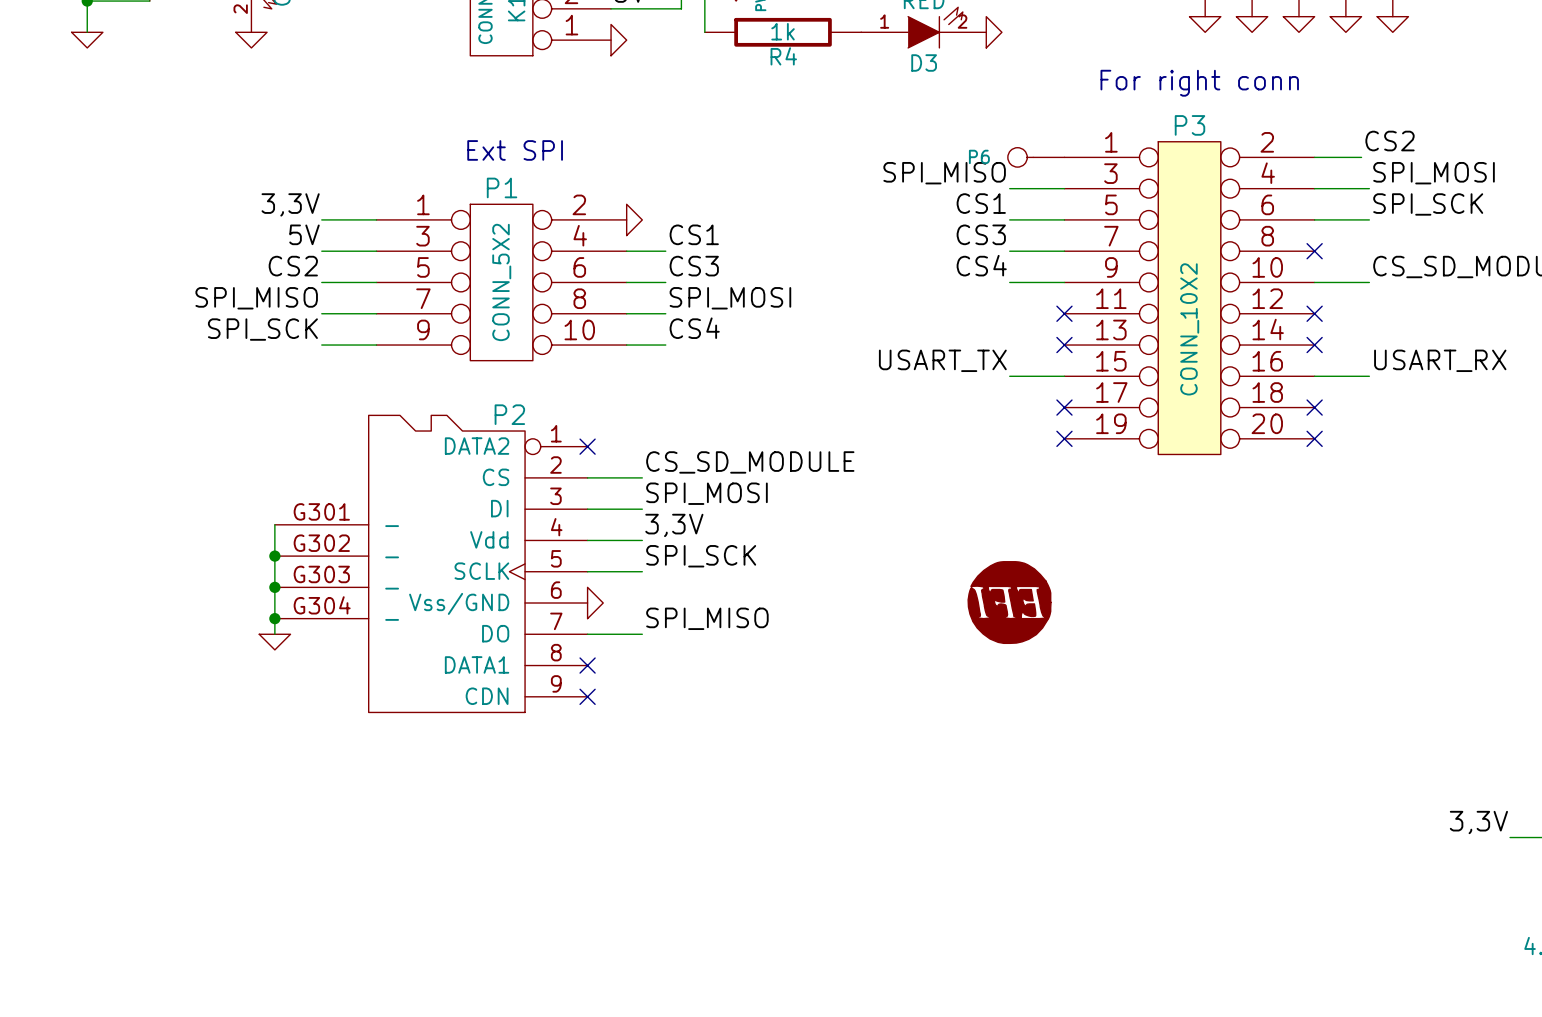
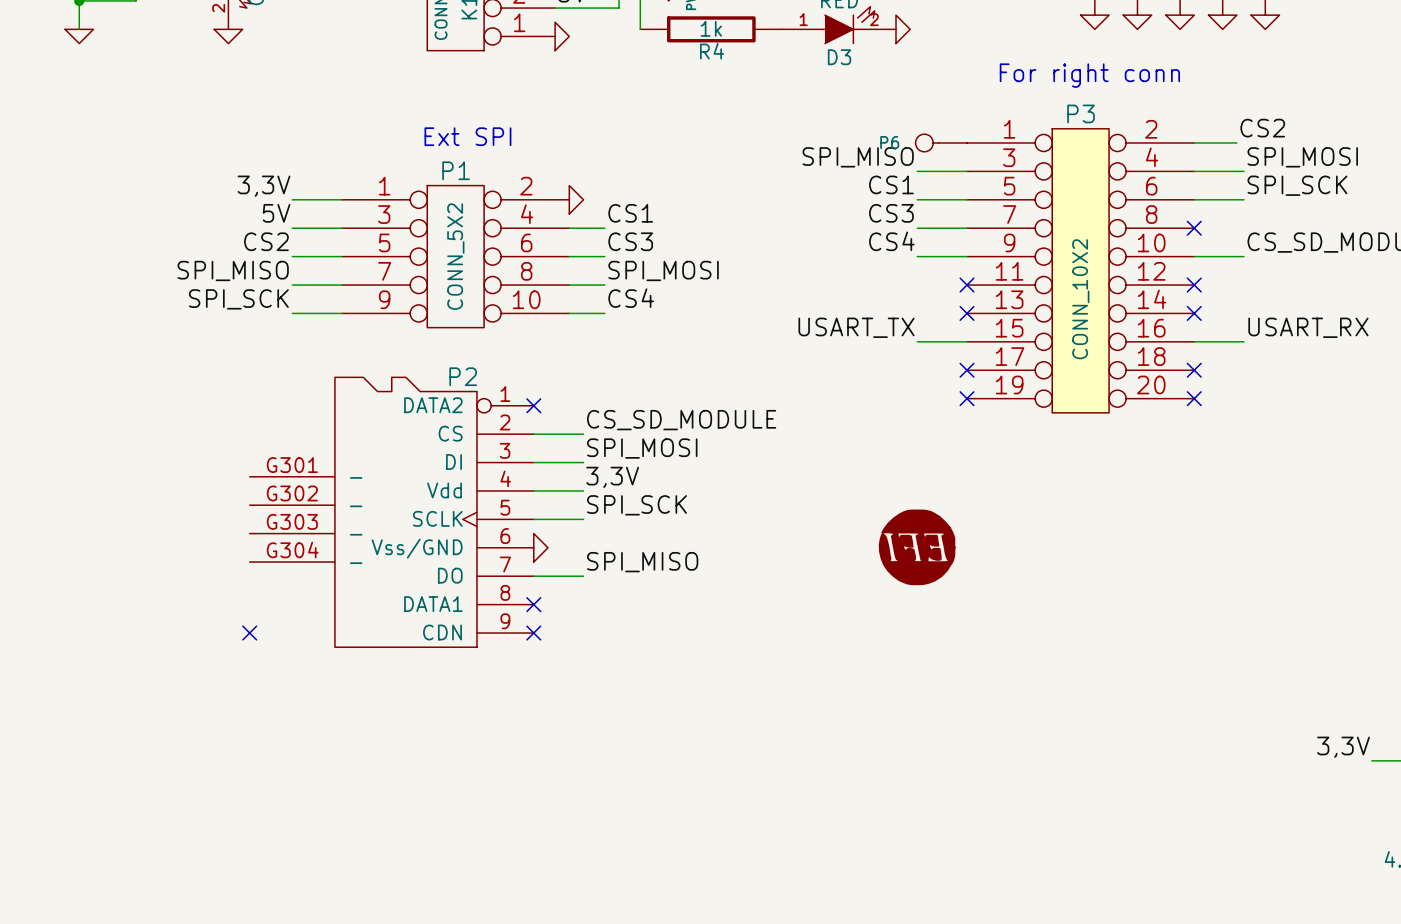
wire: (274, 524) (274, 634) -> none
junction: (274, 556) -> none
junction: (274, 587) -> none
junction: (274, 618) -> none
power symbol: (274, 642) -> none
no-connect mark: none -> (249, 633)

